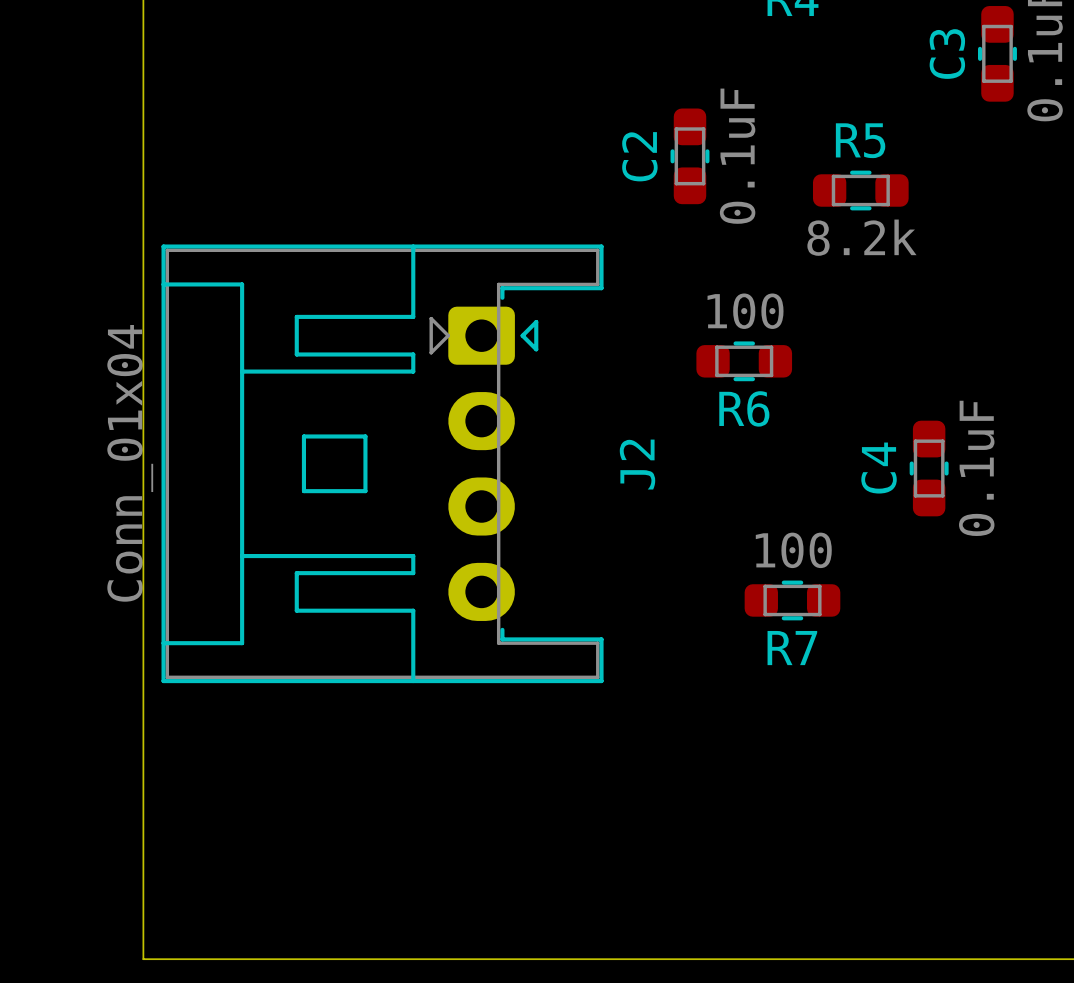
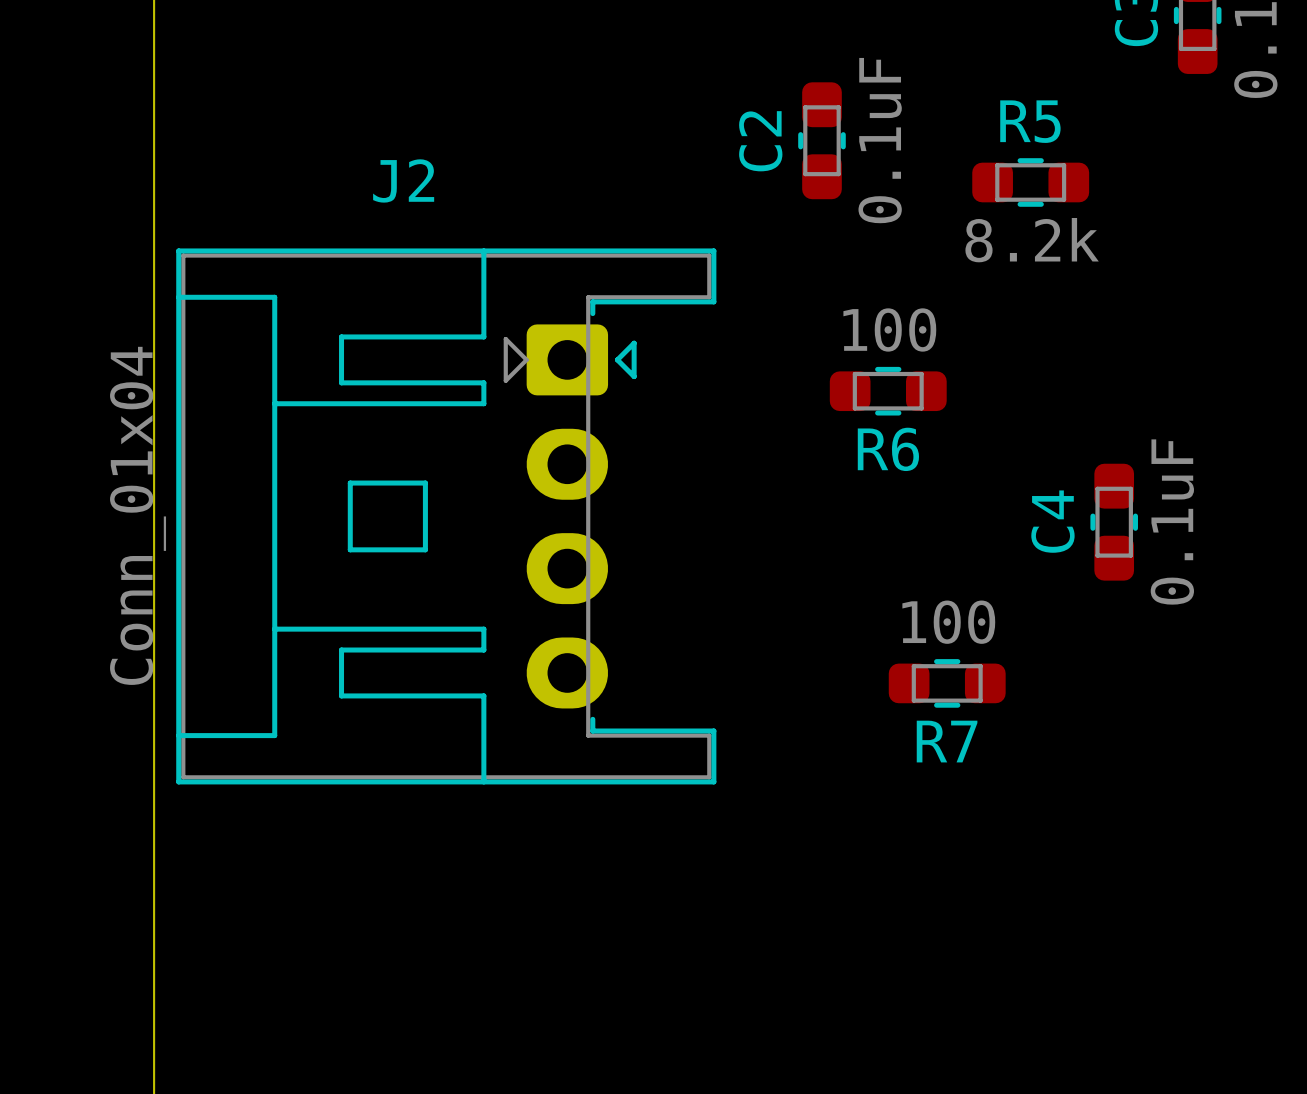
J2 name rotation: 0° (637, 464) -> 90° clockwise (403, 180)
J2 name position: J2 (637, 464) -> J2 (403, 180)

